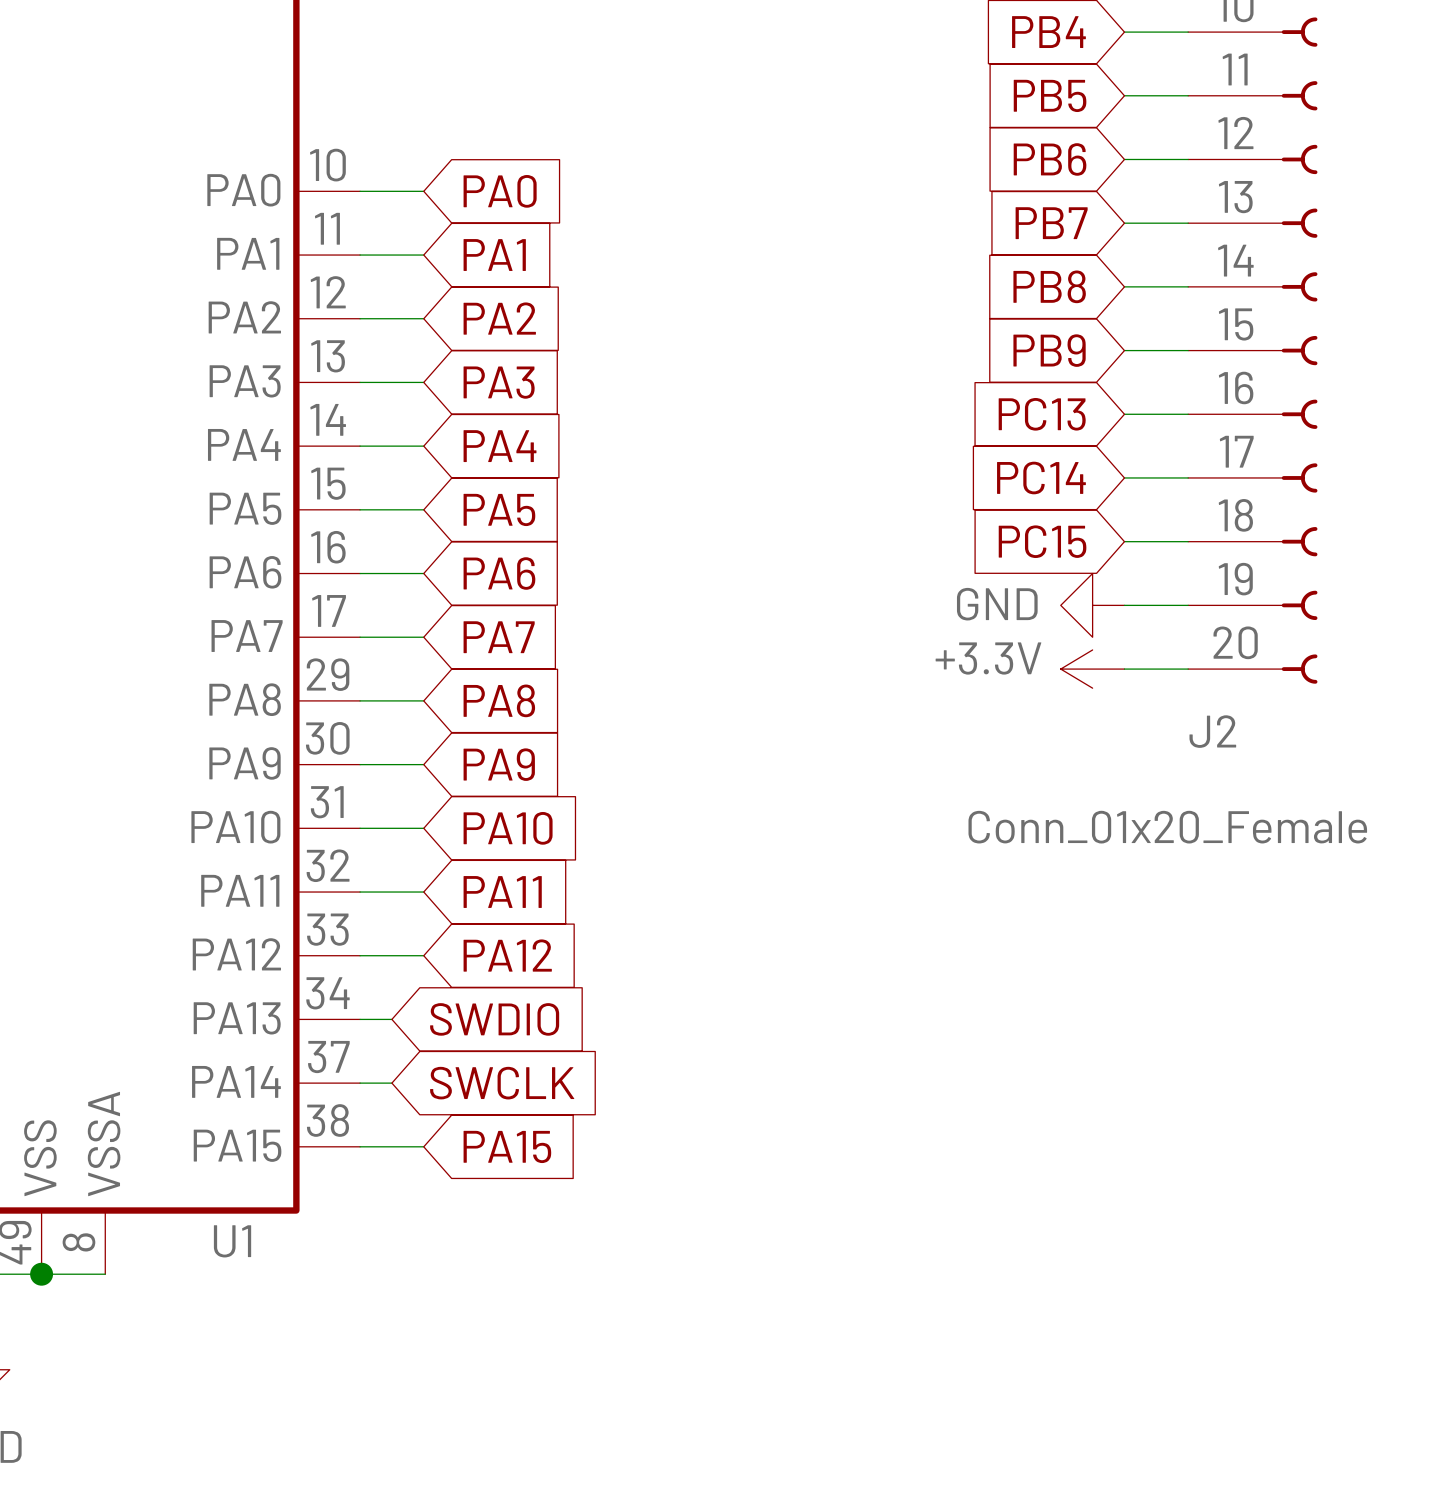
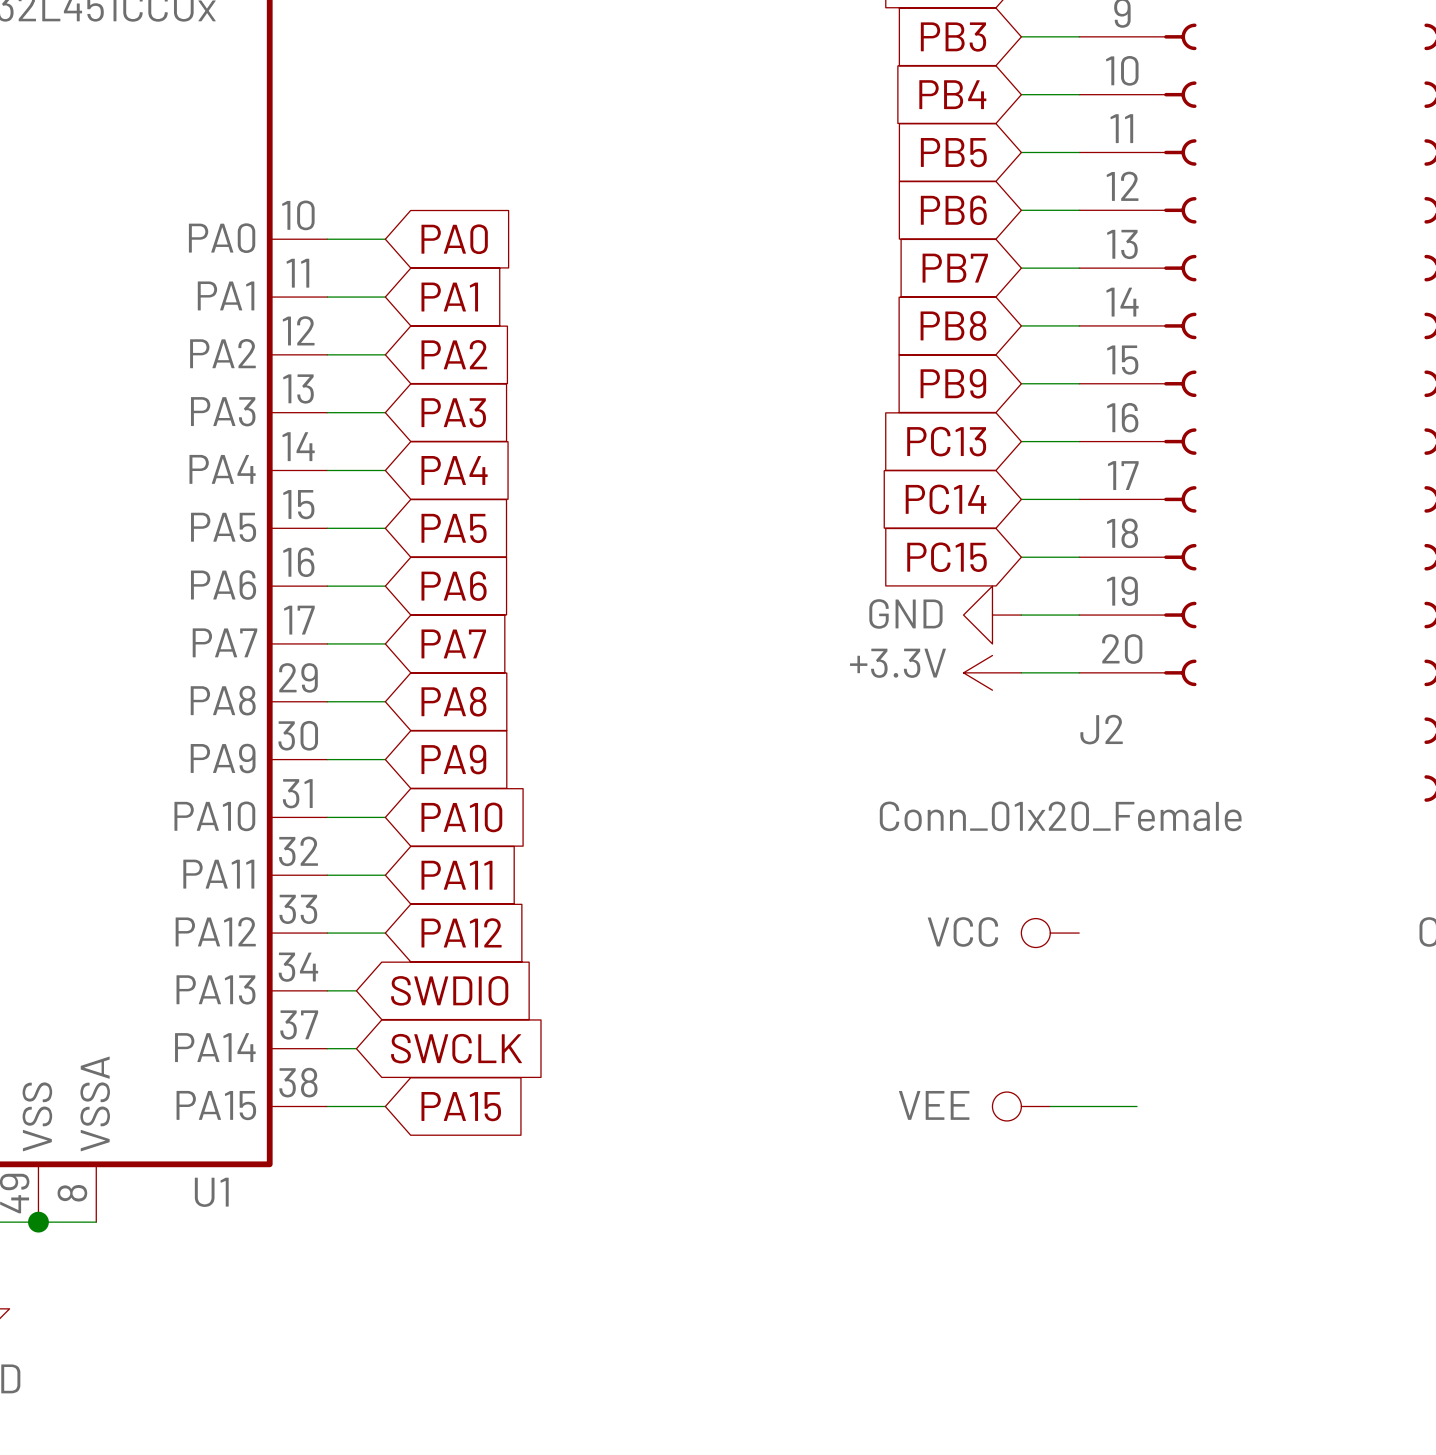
power symbol: none -> VCC (1050, 933)
power symbol: none -> VEE (1021, 1106)
wire: none -> (1050, 1106) (1137, 1106)

